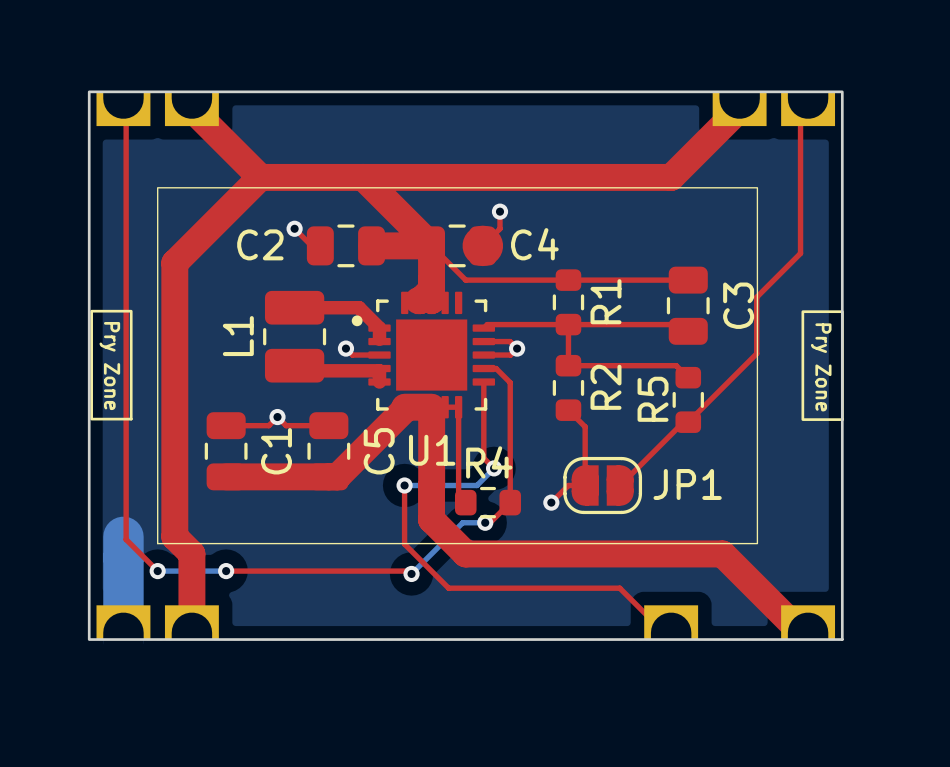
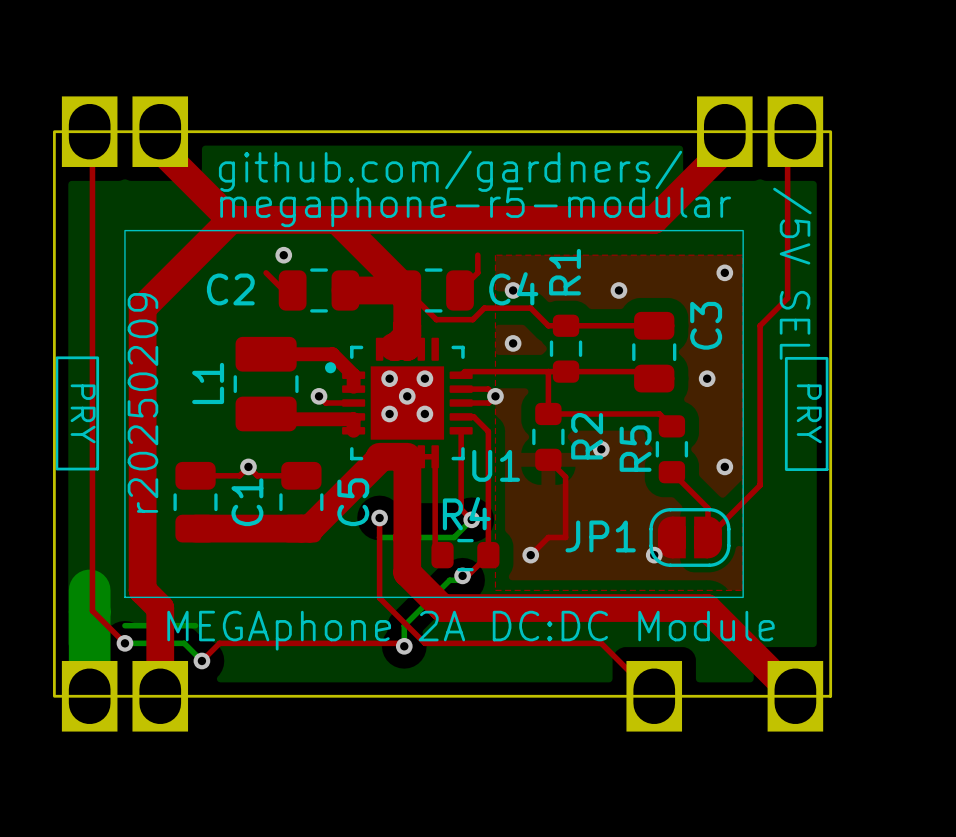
part footprint: [87, 64, 844, 667] -> [53, 96, 833, 732]
text: none -> github.com/gardners/ (450, 171)
text: none -> megaphone-r5-modular (475, 207)
via: (500, 211) -> none
top zone outline: none -> (495, 255) (495, 590) (742, 590) (742, 255) (495, 255)
via position: (294, 228) -> (283, 255)
via: none -> (724, 272)
text: none -> /5V SEL (792, 273)
via: none -> (513, 290)
via: none -> (618, 290)
top track: (459, 274) (465, 280) (568, 280) -> (436, 319) (472, 319) (484, 308) (530, 308) (548, 325)
top track: (773, 280) (756, 297) (756, 353) (688, 422) -> (760, 325) (760, 485) (708, 537) (708, 508) (671, 472)
via: none -> (513, 343)
R1 name position: R1 (605, 301) -> R1 (564, 272)
R1 position: (568, 302) -> (566, 348)
C3 position: (688, 305) -> (654, 352)
C3 name position: C3 (738, 305) -> C3 (706, 325)
via: none -> (389, 378)
via: none -> (424, 378)
via: none -> (707, 378)
via: none -> (407, 396)
text: none -> r20250209 (142, 402)
via: none -> (389, 413)
via: none -> (424, 413)
via: none -> (601, 449)
via: none -> (724, 466)
top track: (683, 422) (620, 485) -> none
U1 name position: U1 (432, 450) -> U1 (496, 465)
JP1 name position: JP1 (687, 484) -> JP1 (600, 536)
via position: (404, 485) -> (379, 517)
JP1 position: (602, 485) -> (689, 537)
via: none -> (654, 555)
bottom track: (485, 522) (462, 522) (411, 573) -> none
bottom track: none -> (462, 580) (449, 580) (404, 625) (404, 646)
top track: (126, 539) (157, 571) -> (92, 593) (92, 610) (124, 643)
via position: (157, 571) -> (124, 643)
top track: (226, 571) (408, 571) (411, 573) -> none
via position: (226, 571) -> (201, 660)
via position: (411, 573) -> (404, 646)
text: none -> MEGAphone 2A DC:DC Module (471, 630)
bottom track: none -> (124, 643) (184, 643) (201, 660)
top track: none -> (404, 646) (401, 643) (219, 643) (201, 660)

